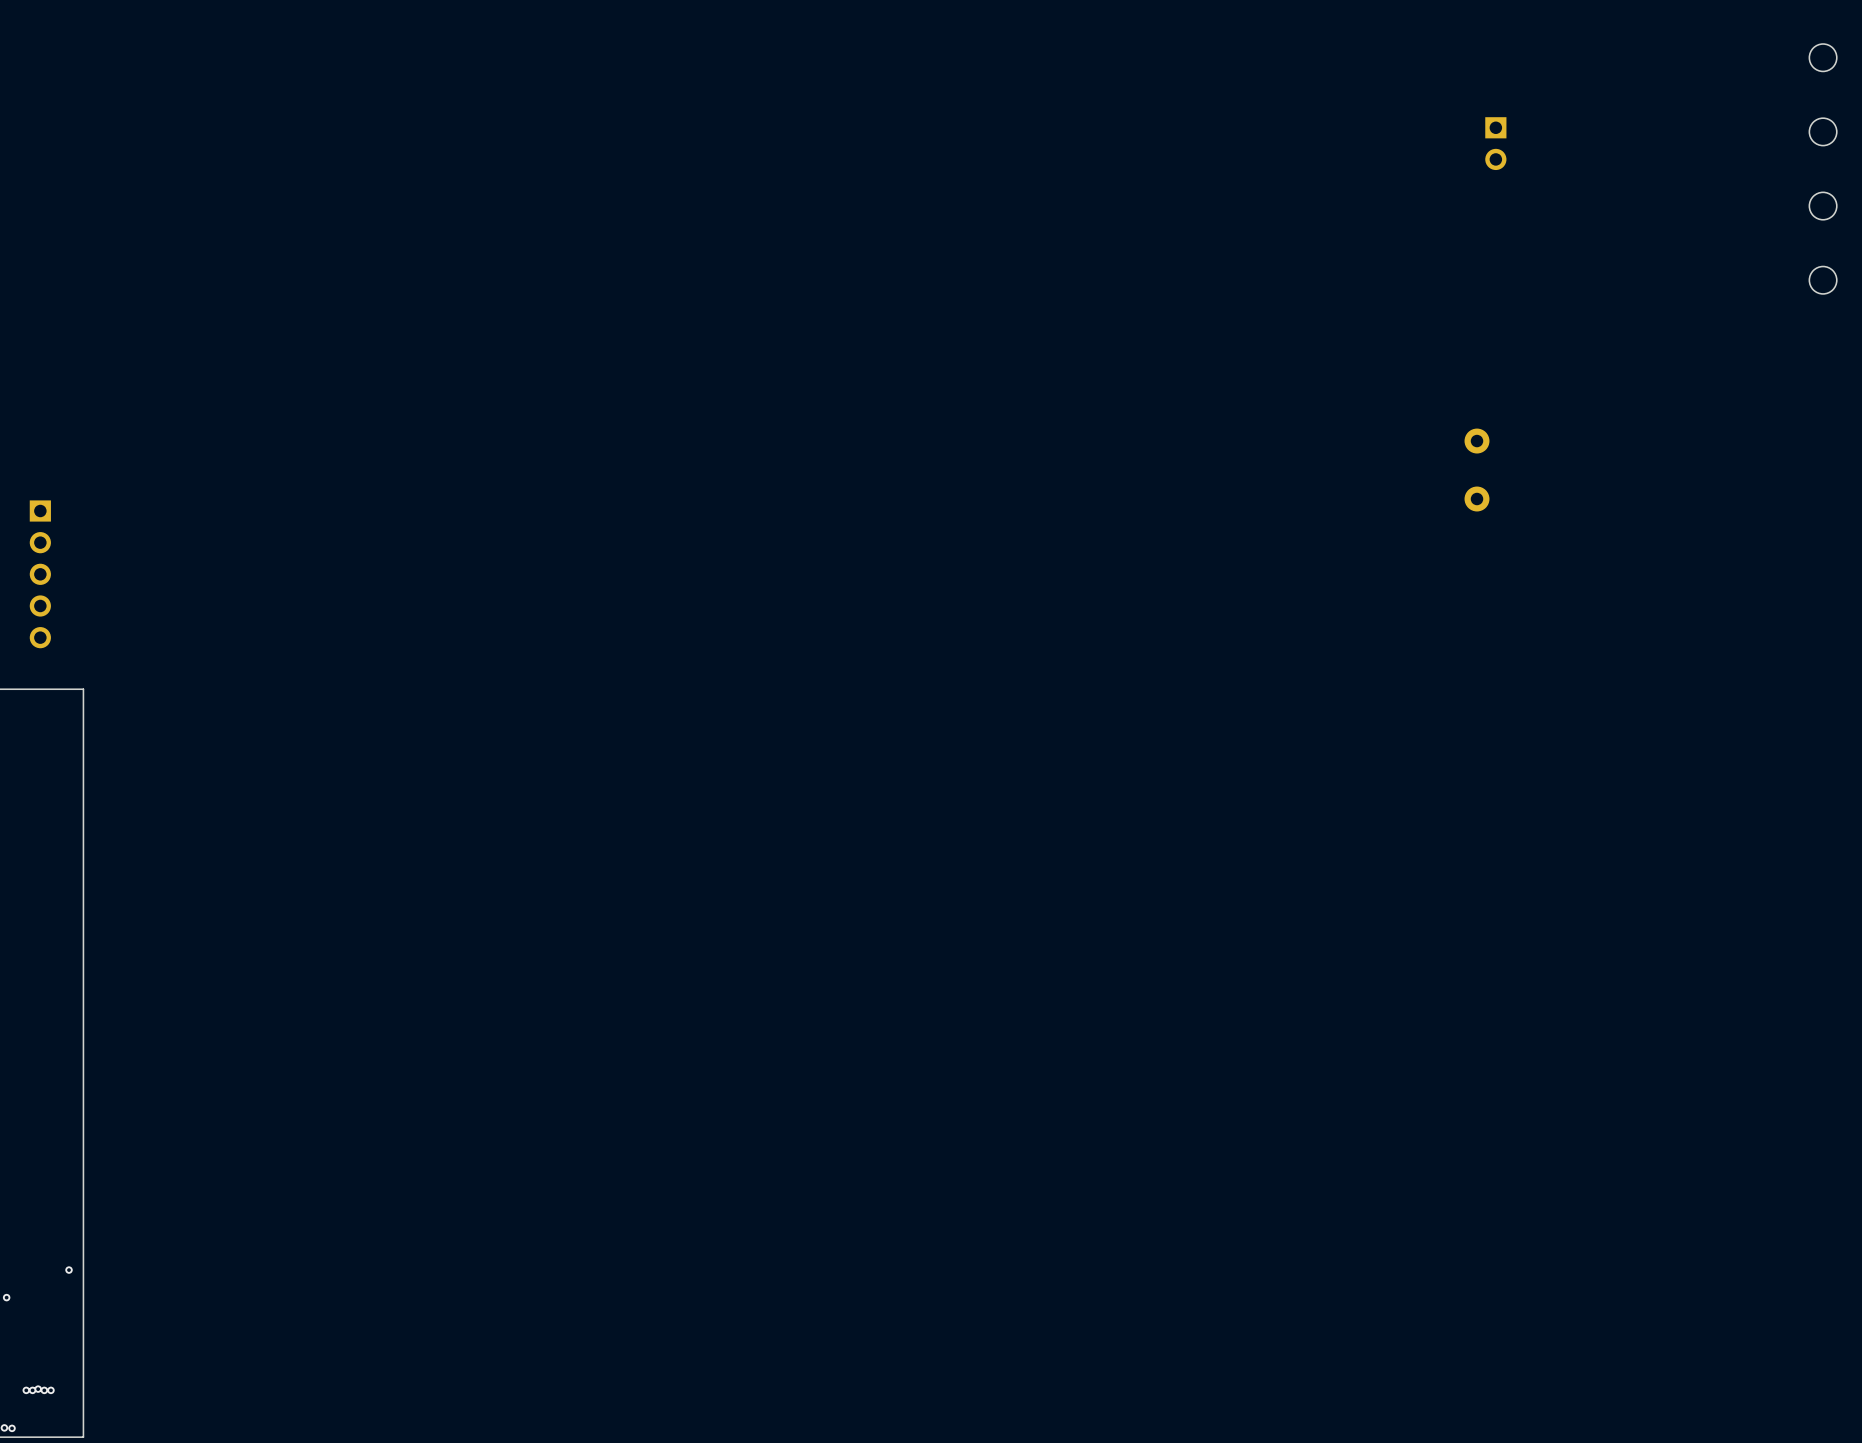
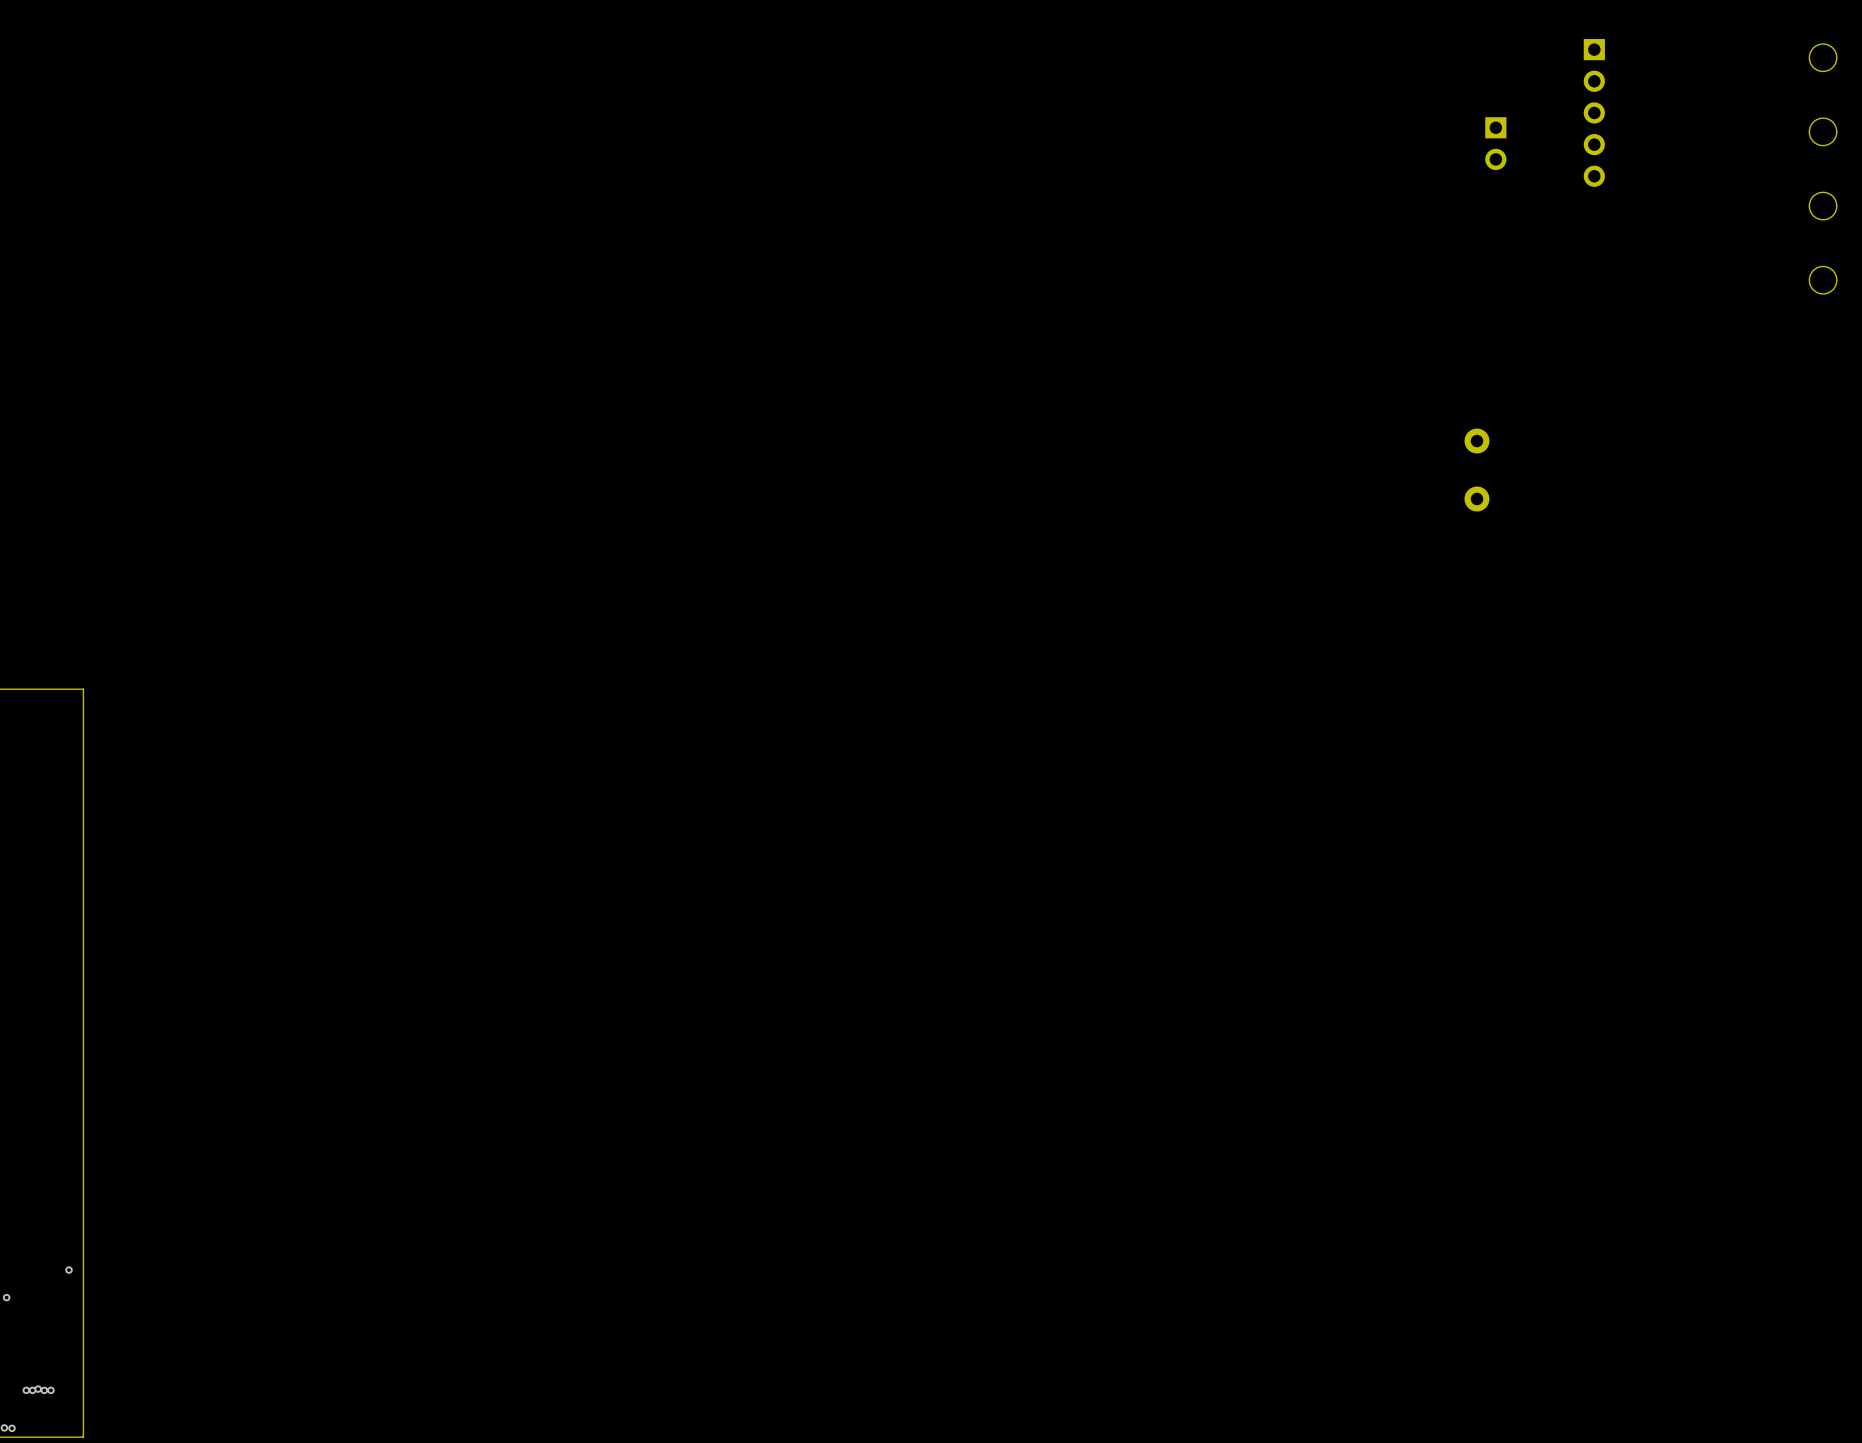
part: none -> (1594, 112)
part: (40, 574) -> none

